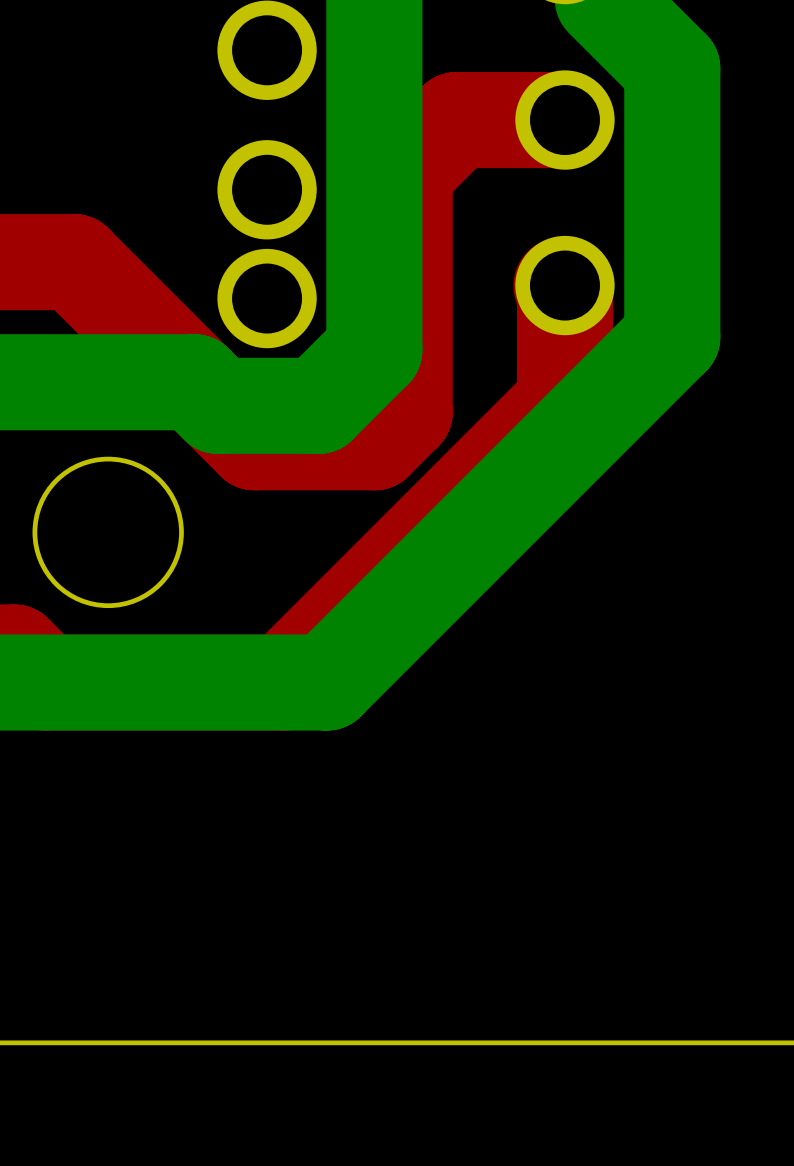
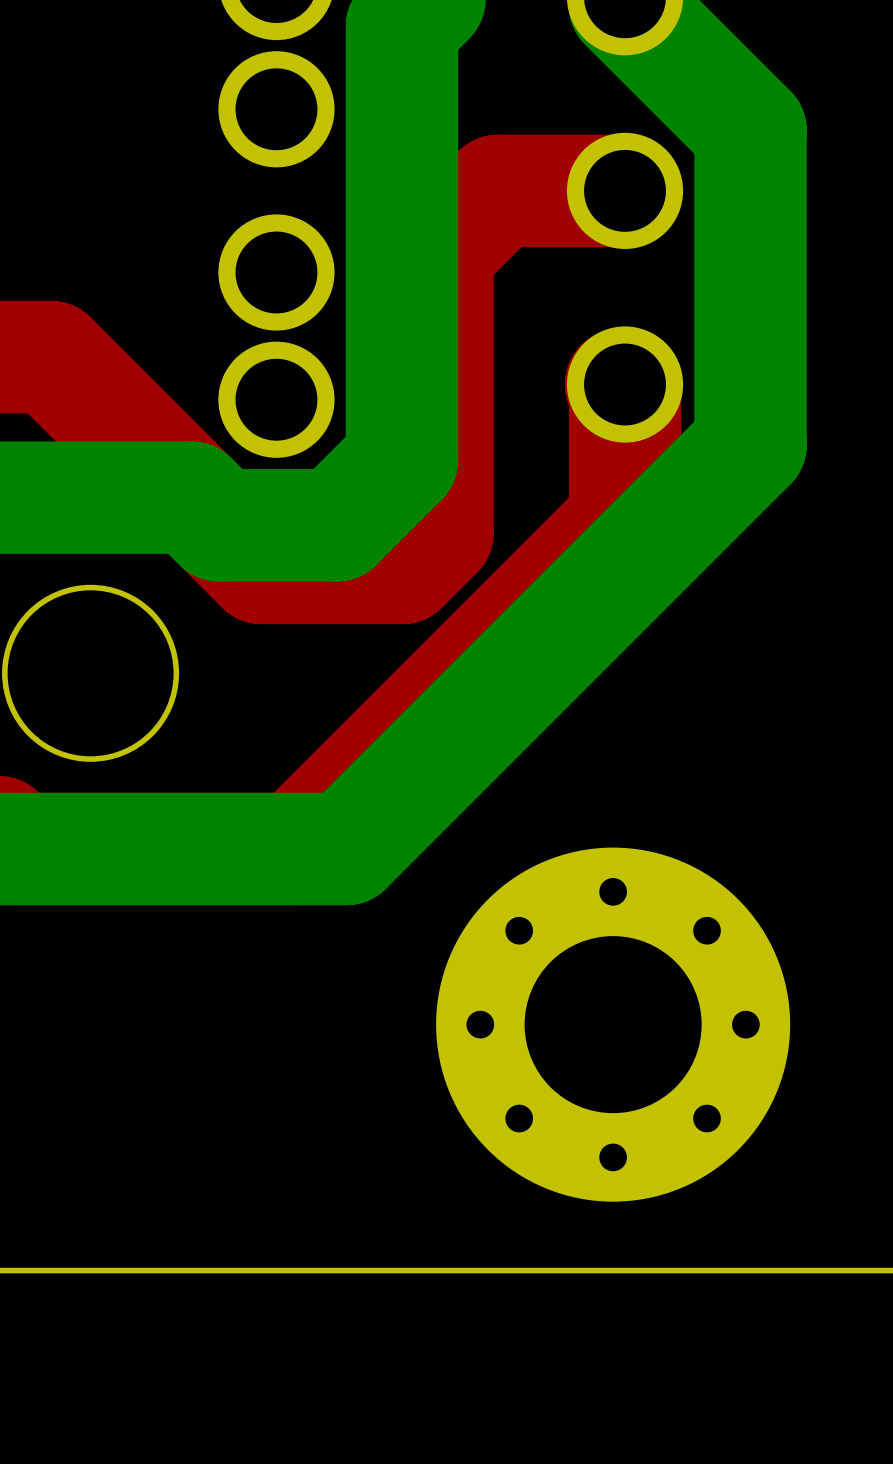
part: none -> (613, 1024)

